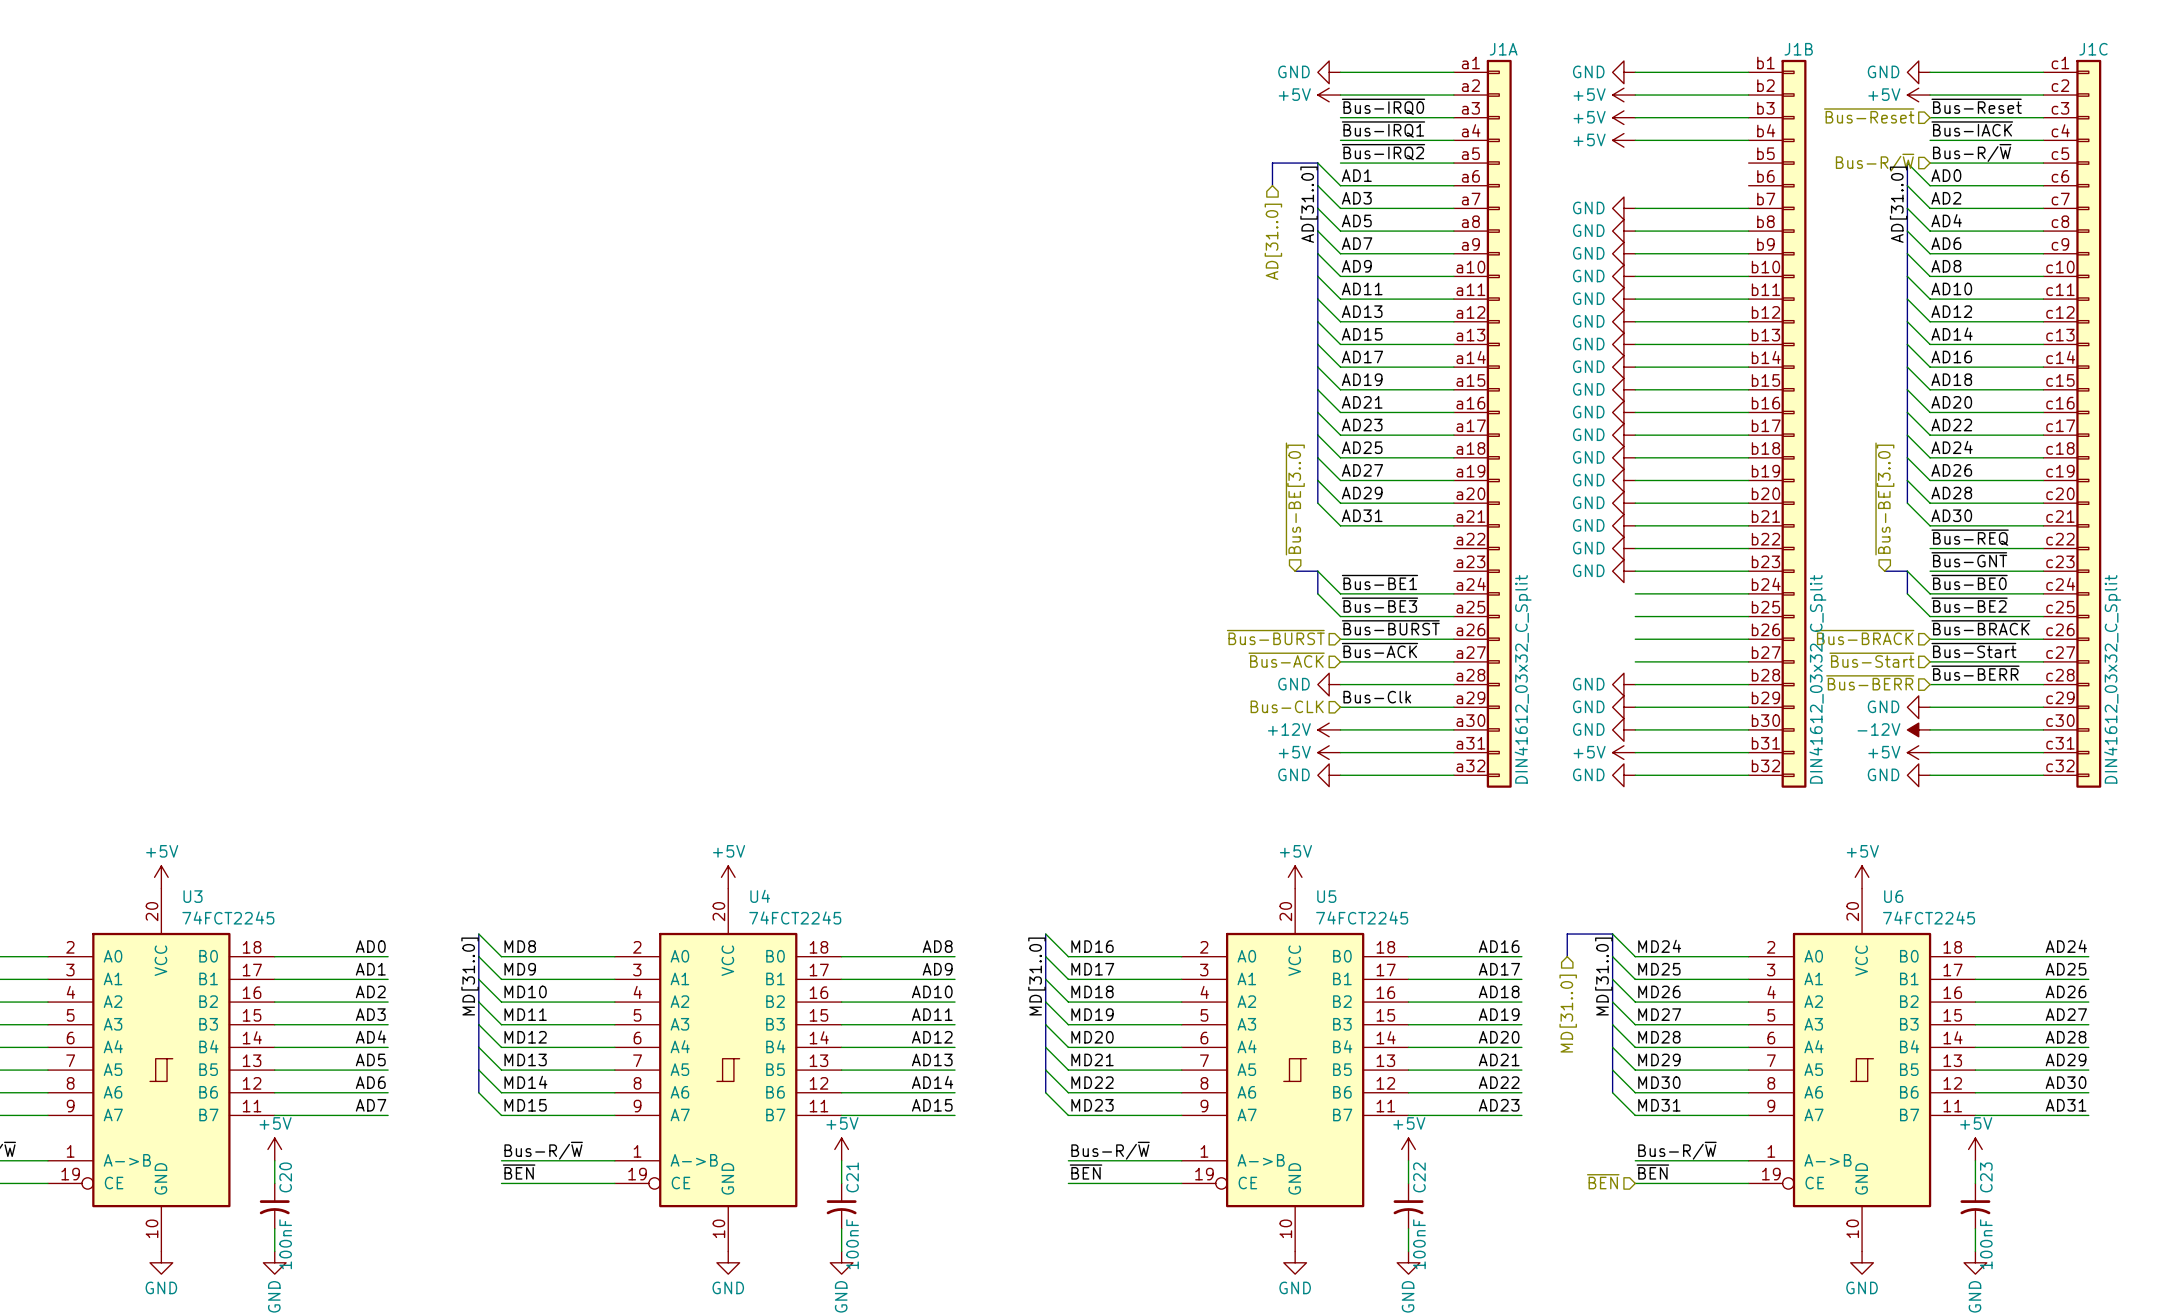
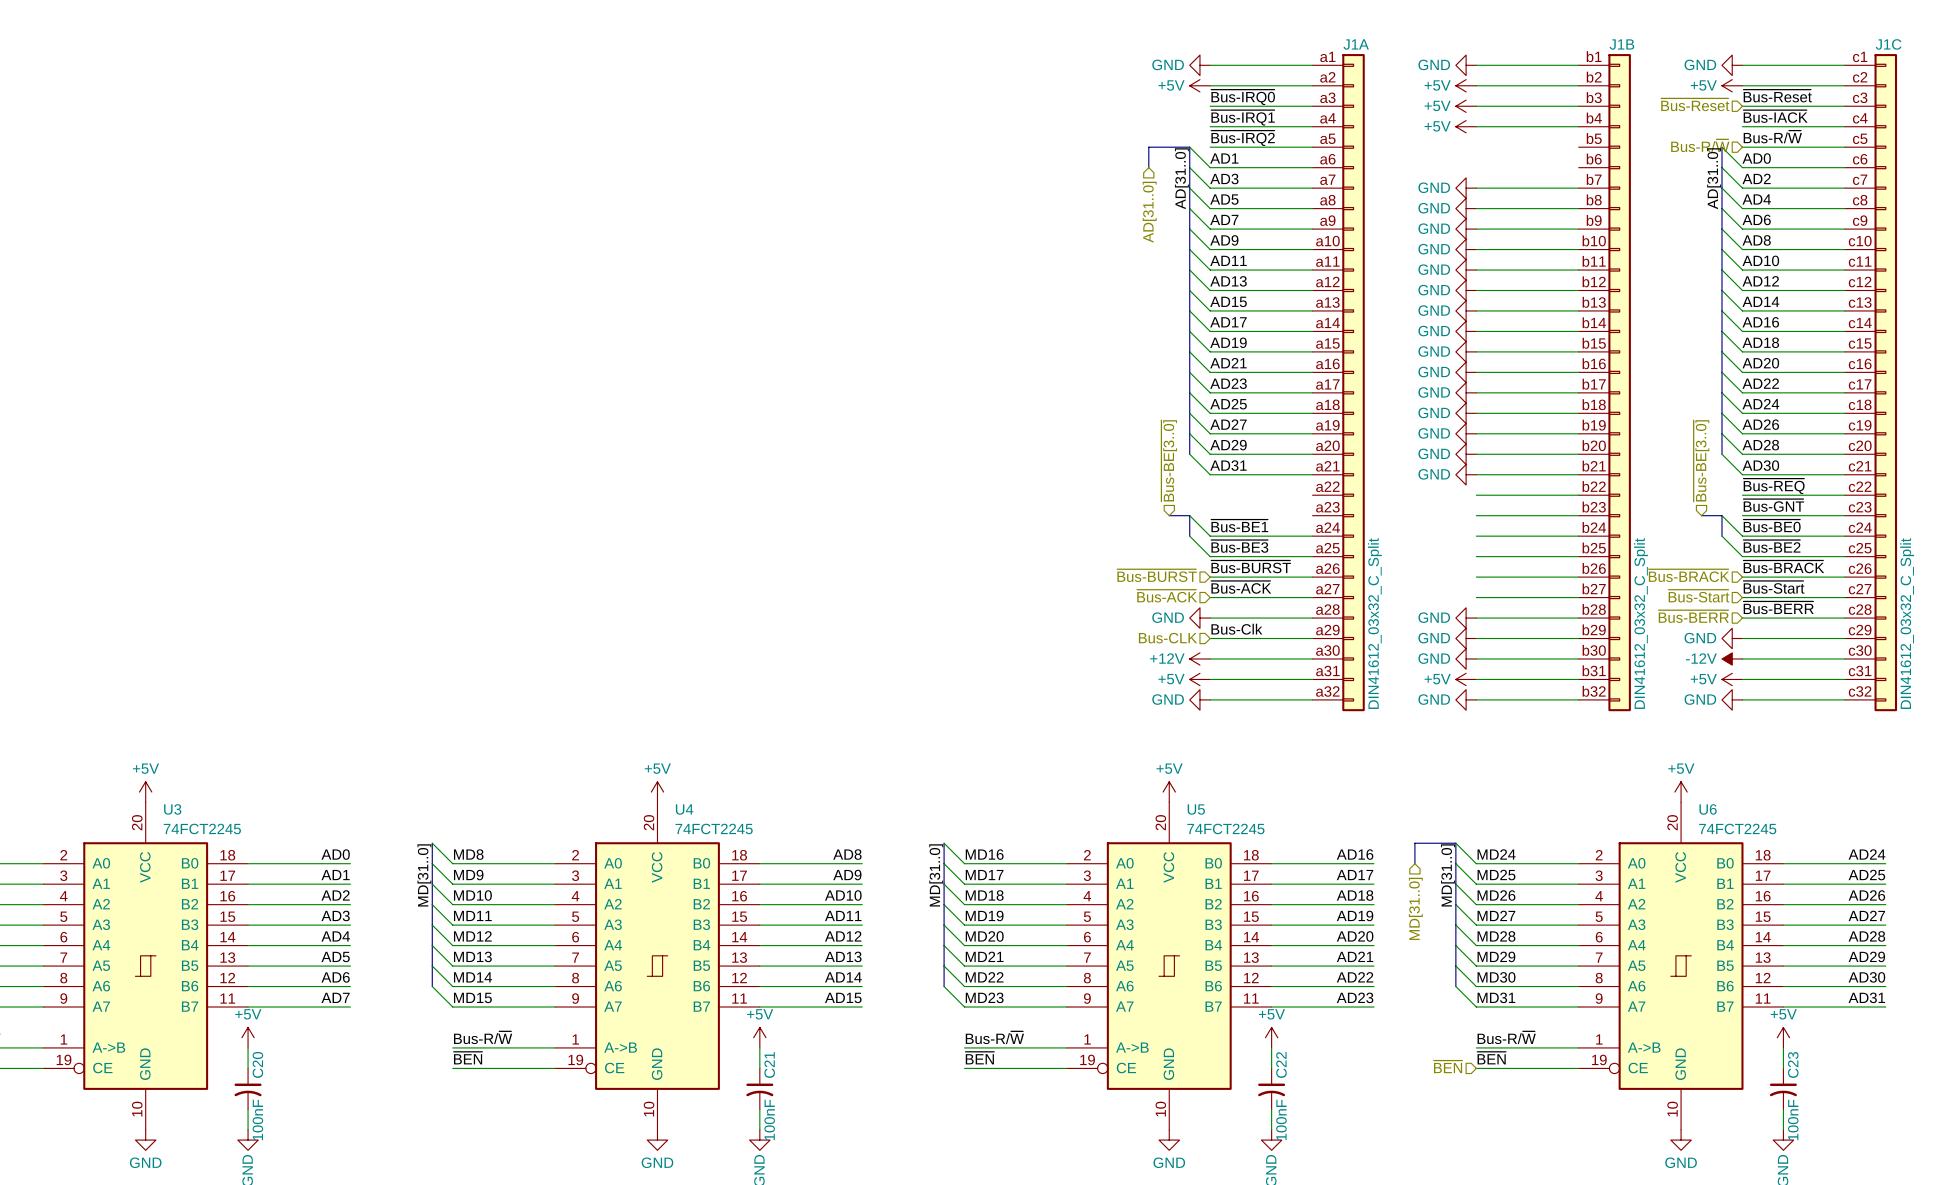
power symbol: GND (1623, 548) -> none
power symbol: GND (1623, 571) -> none

